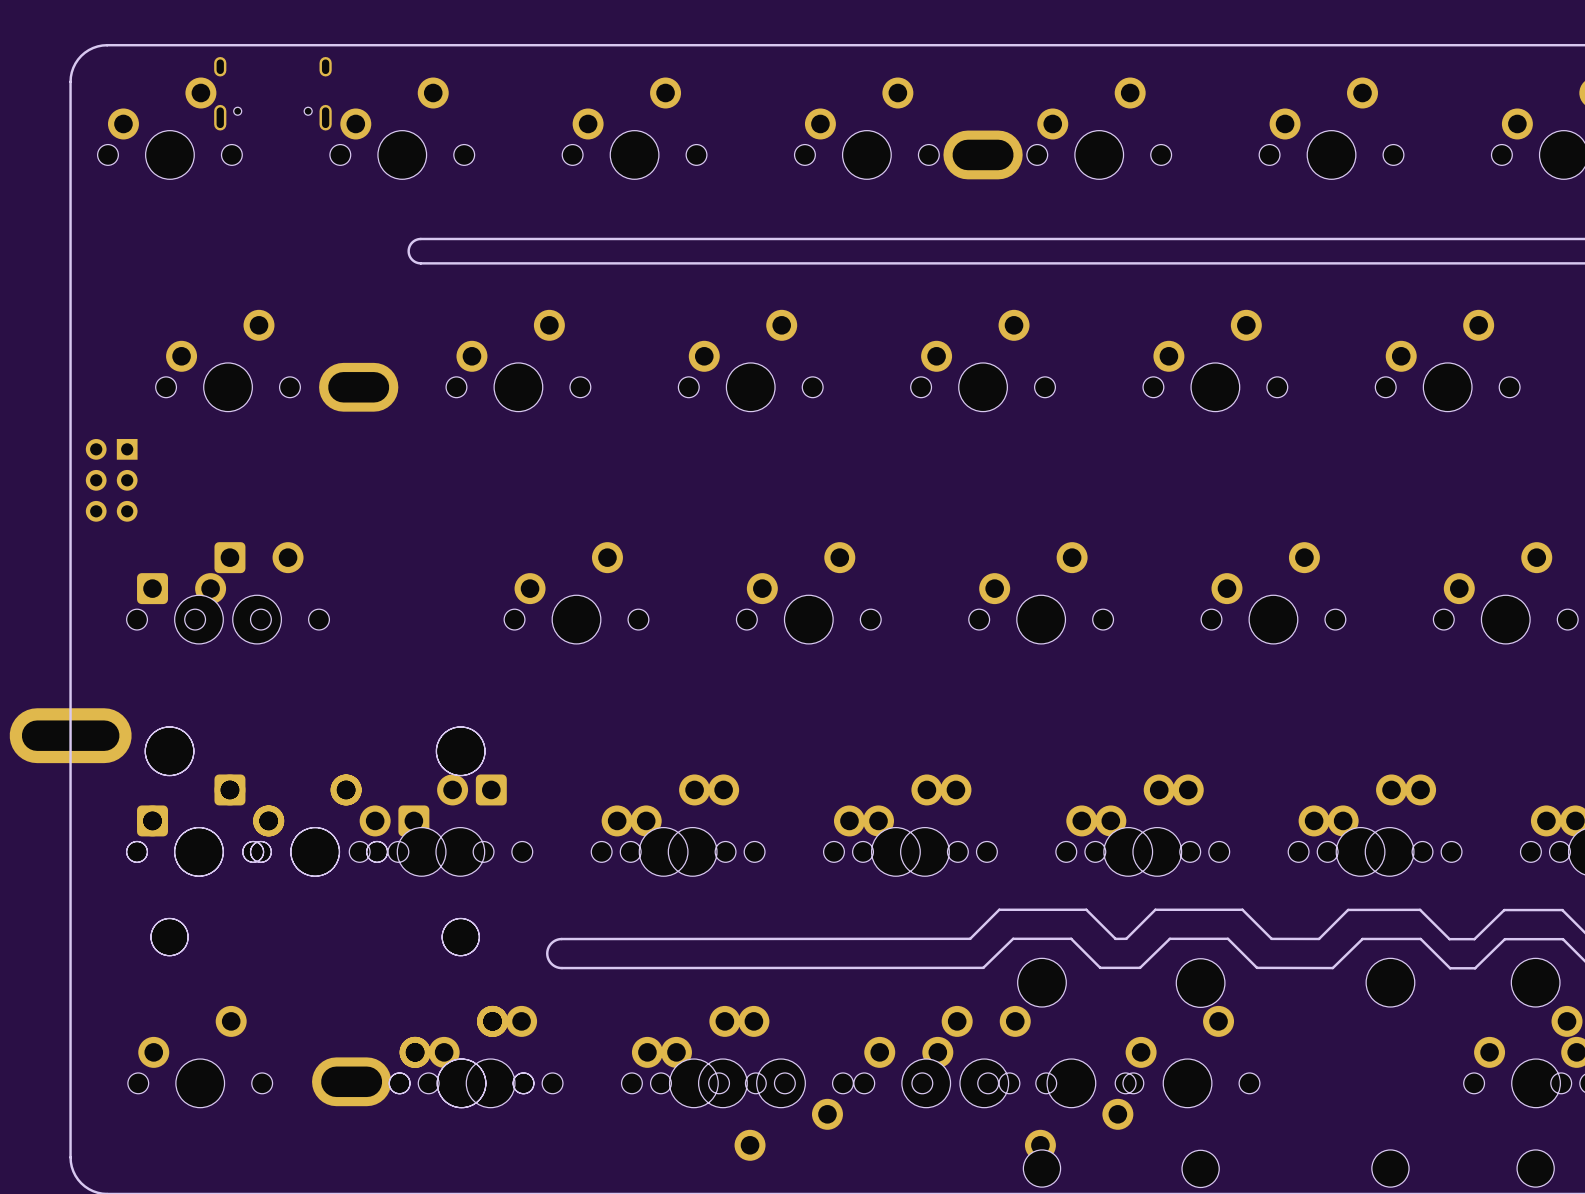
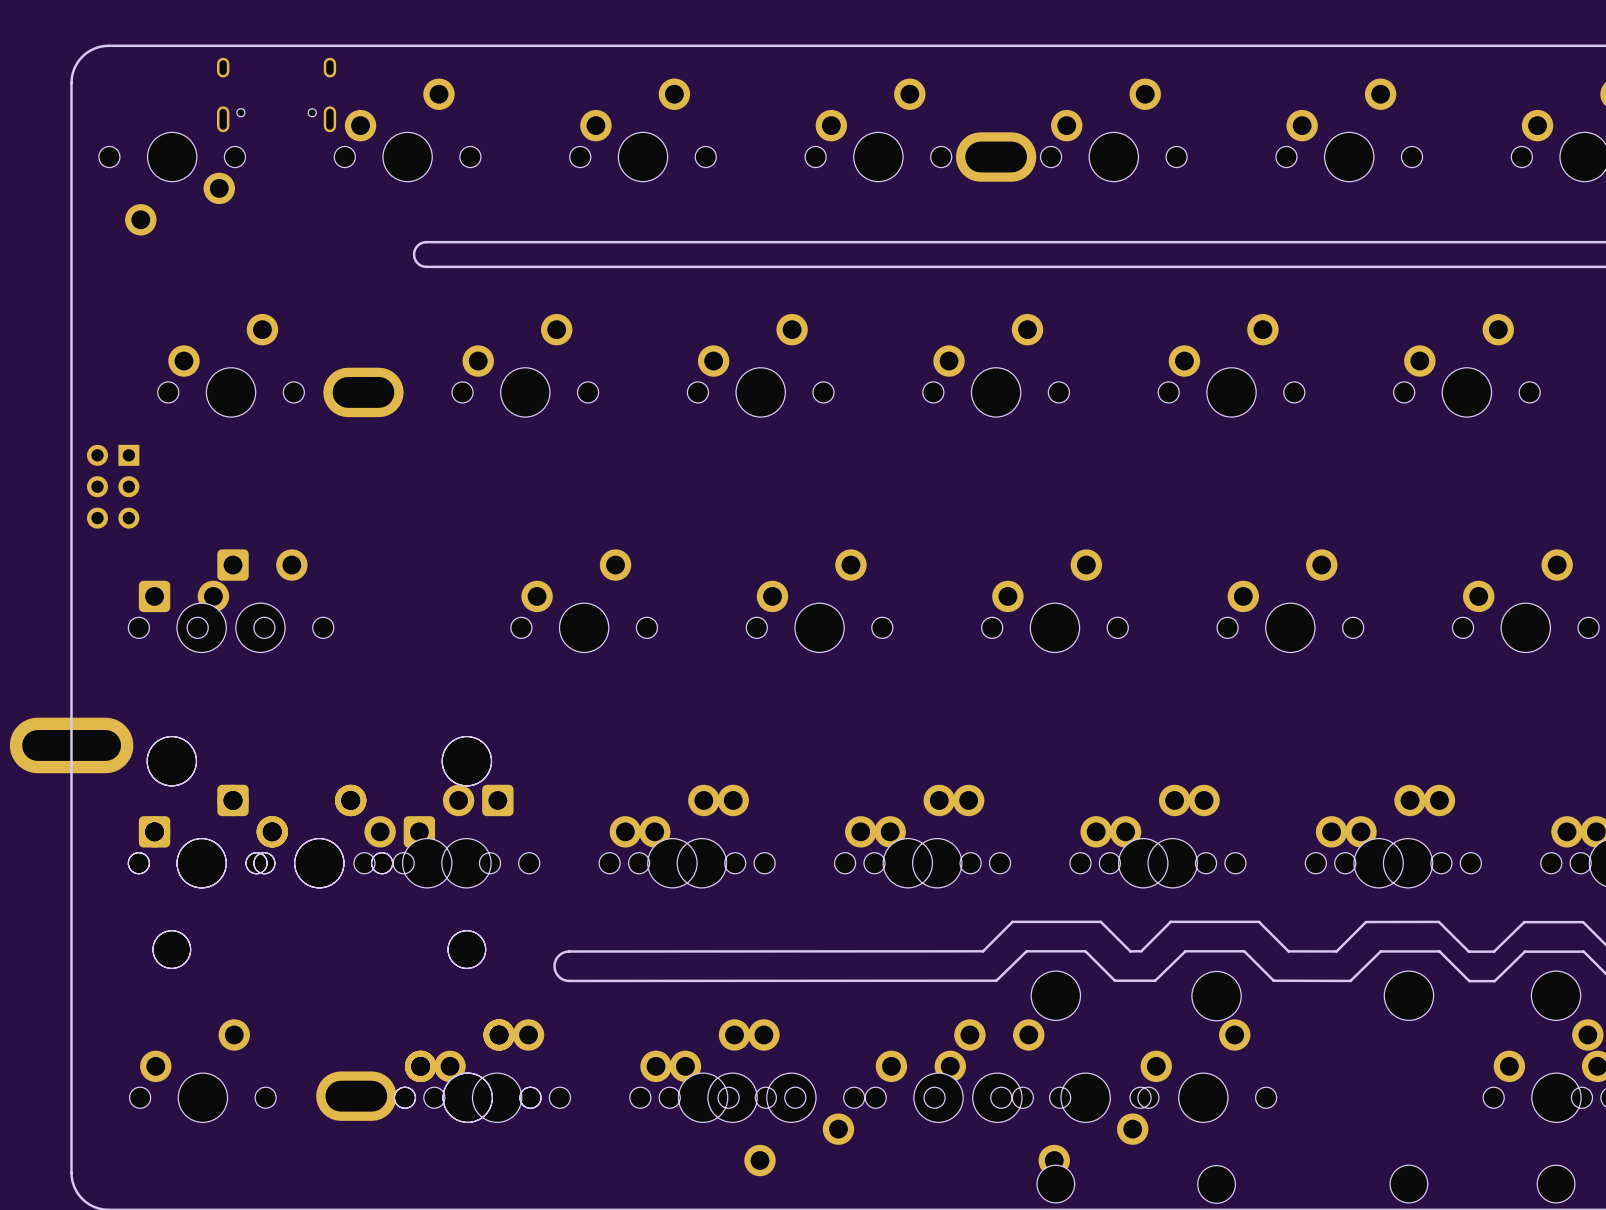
part rotation: 0° (169, 128) -> 180° (172, 183)

